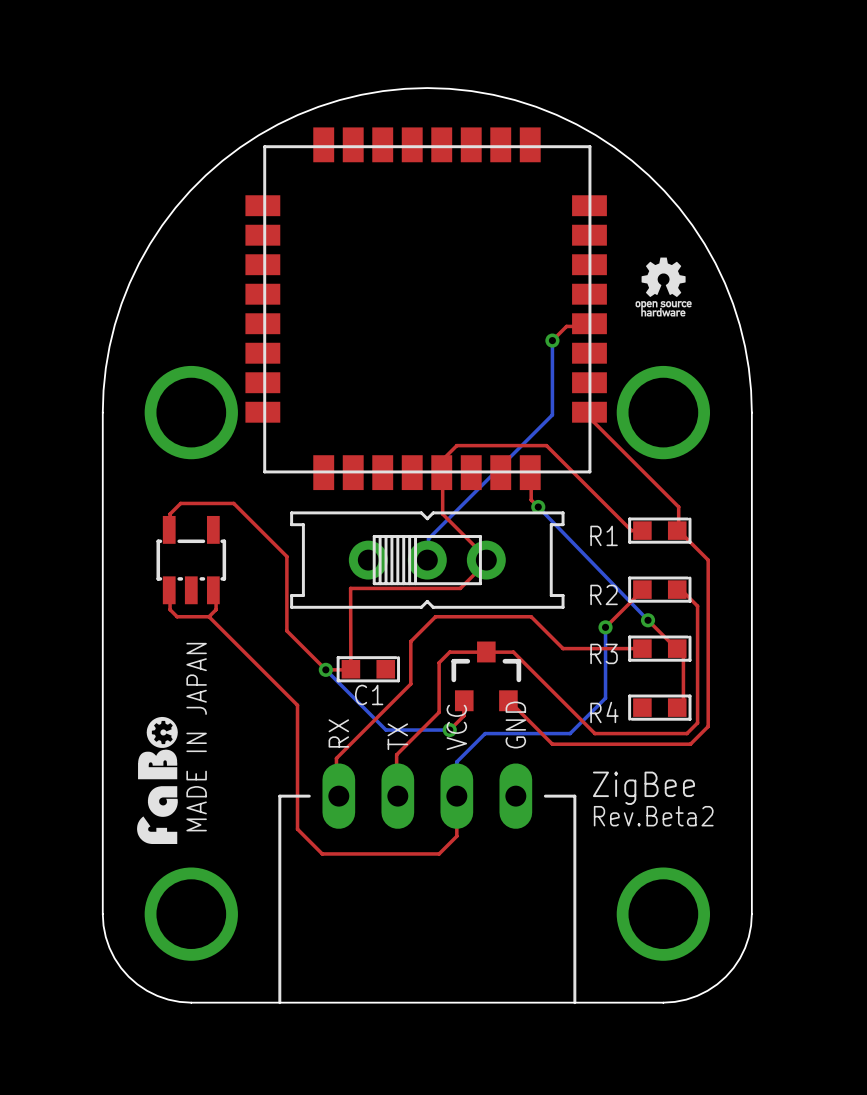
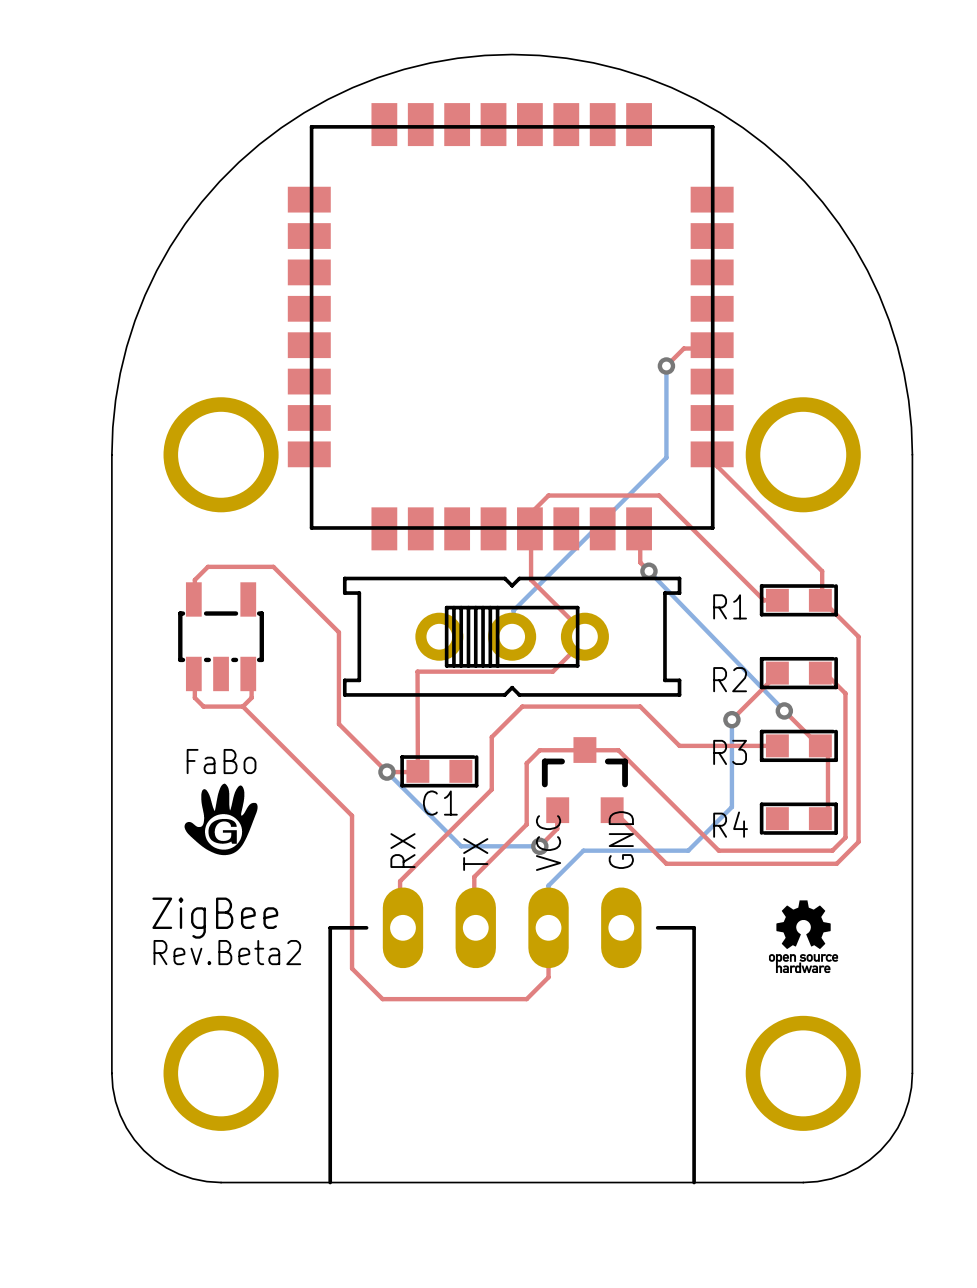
drawing position: (663, 287) -> (803, 936)
drawing: none -> [184, 783, 258, 856]
drawing: [137, 716, 178, 844] -> none
text: MADE IN JAPAN (196, 737) -> none
text position: ZigBee (643, 788) -> ZigBee (215, 918)
text position: Rev.Beta2 (653, 816) -> Rev.Beta2 (227, 952)

